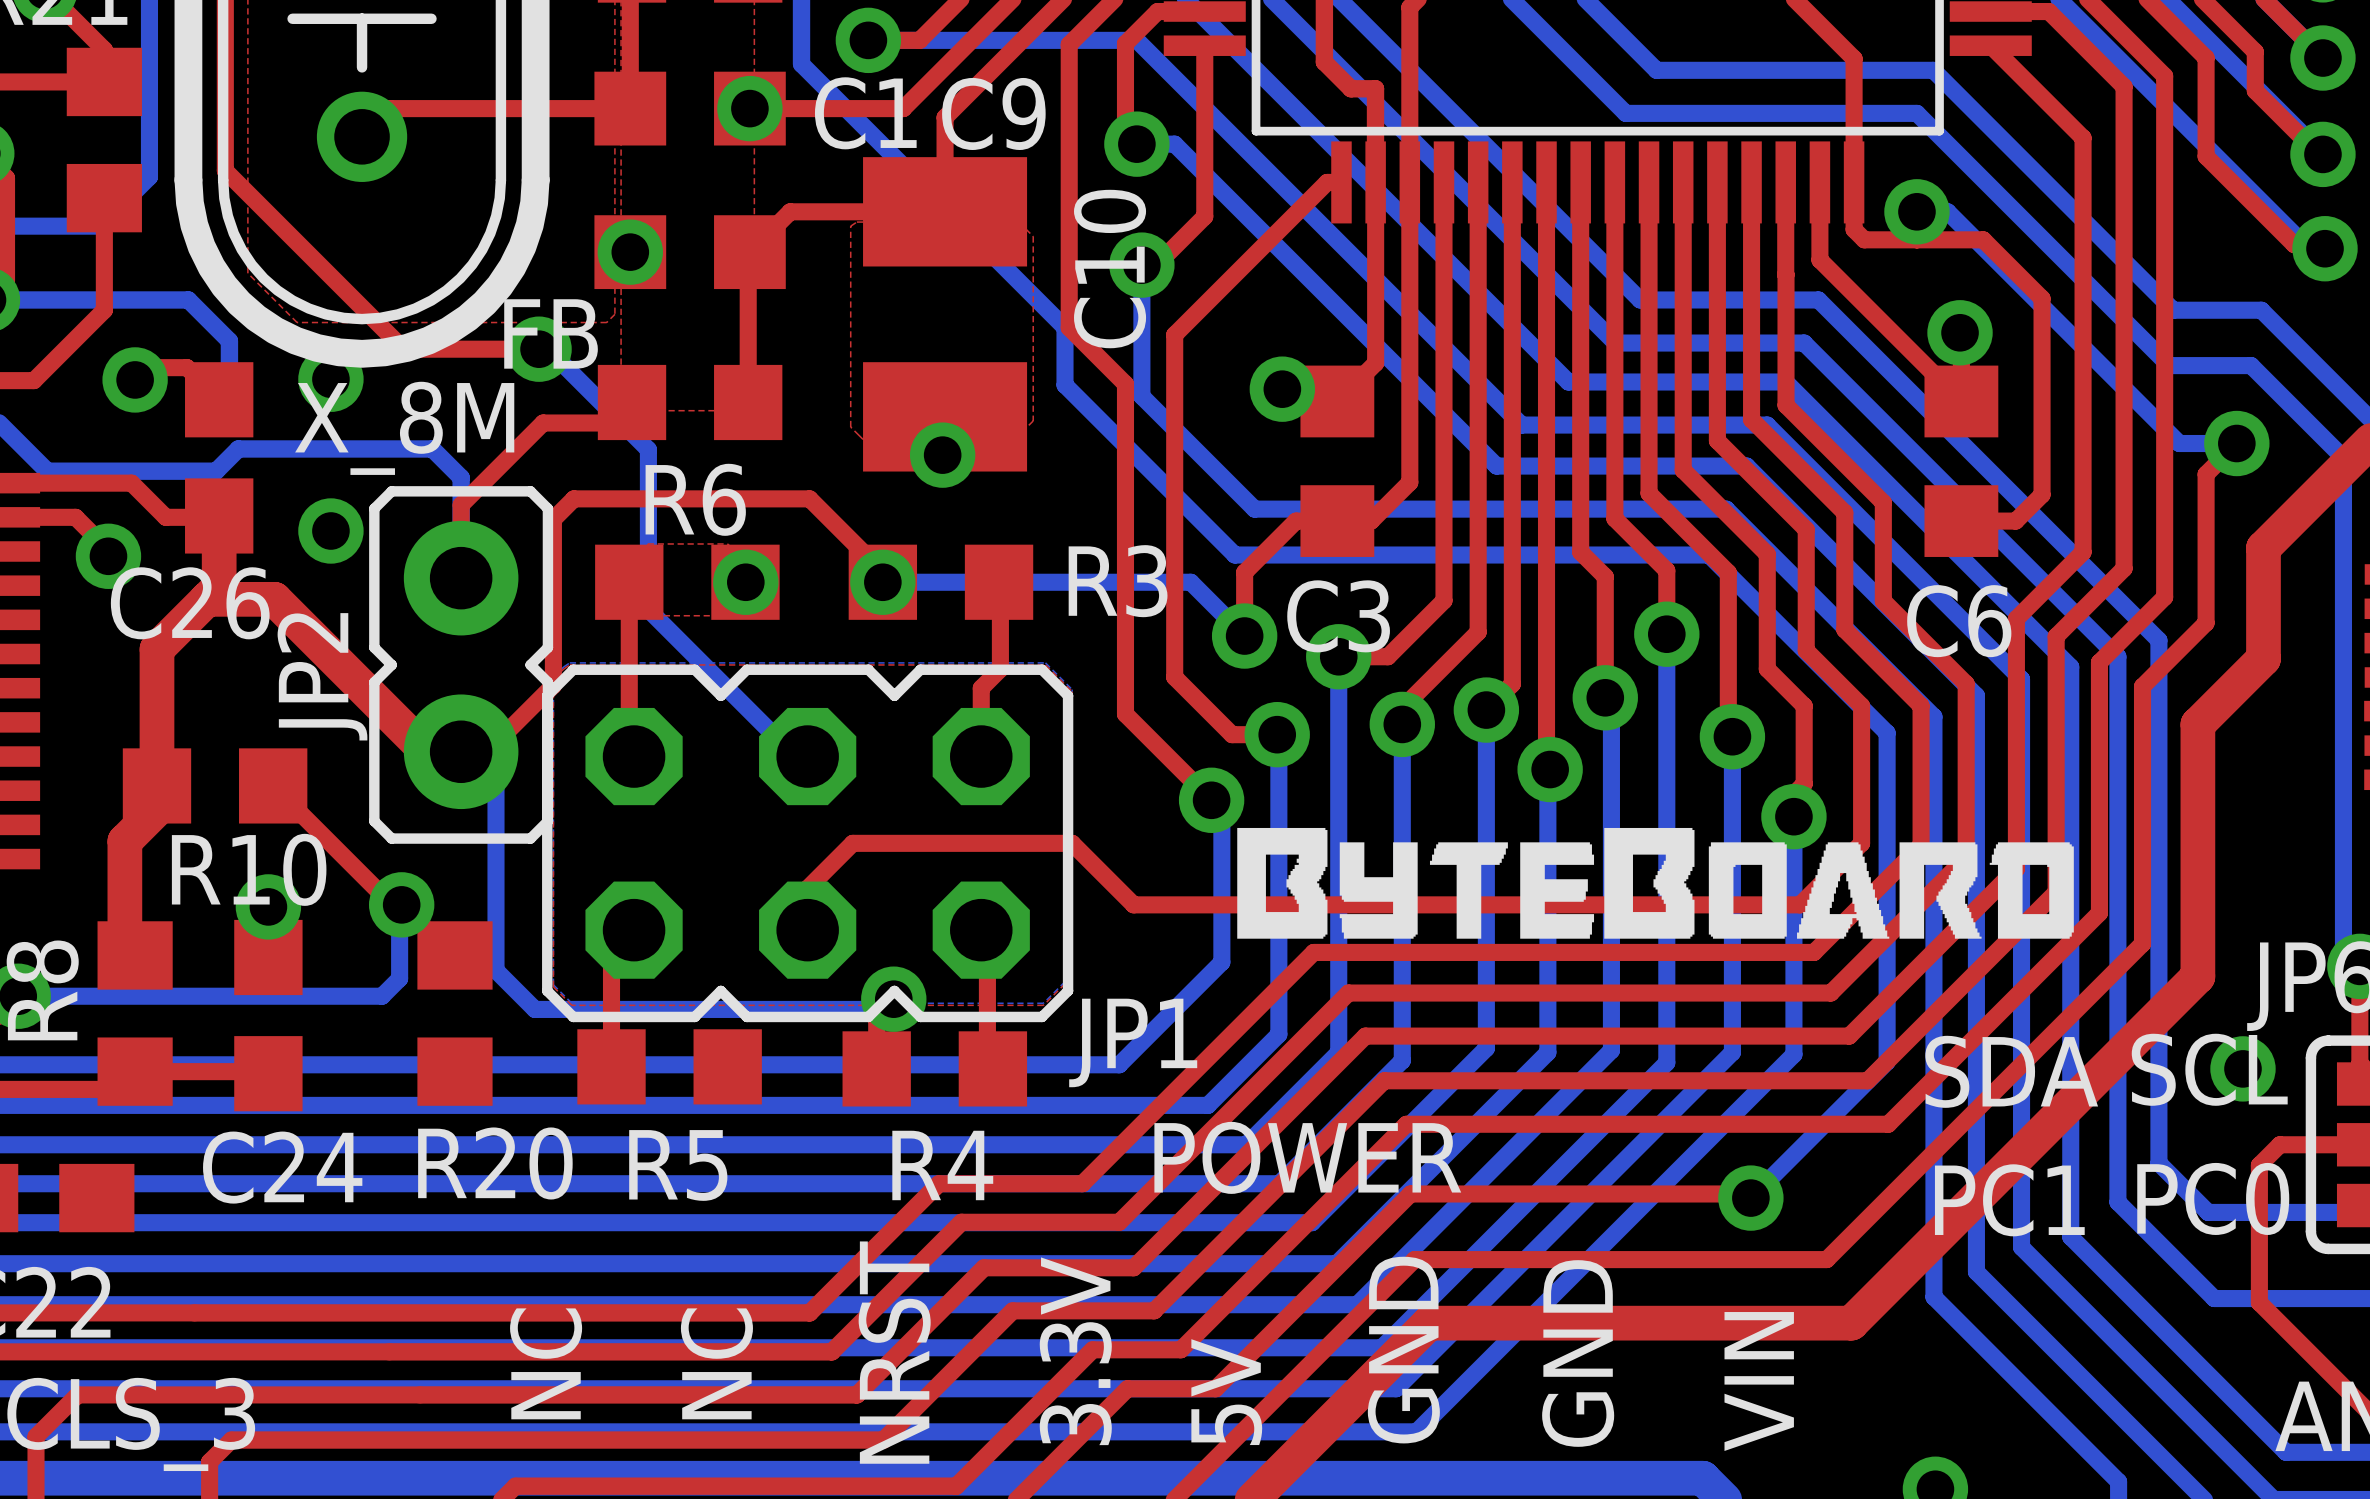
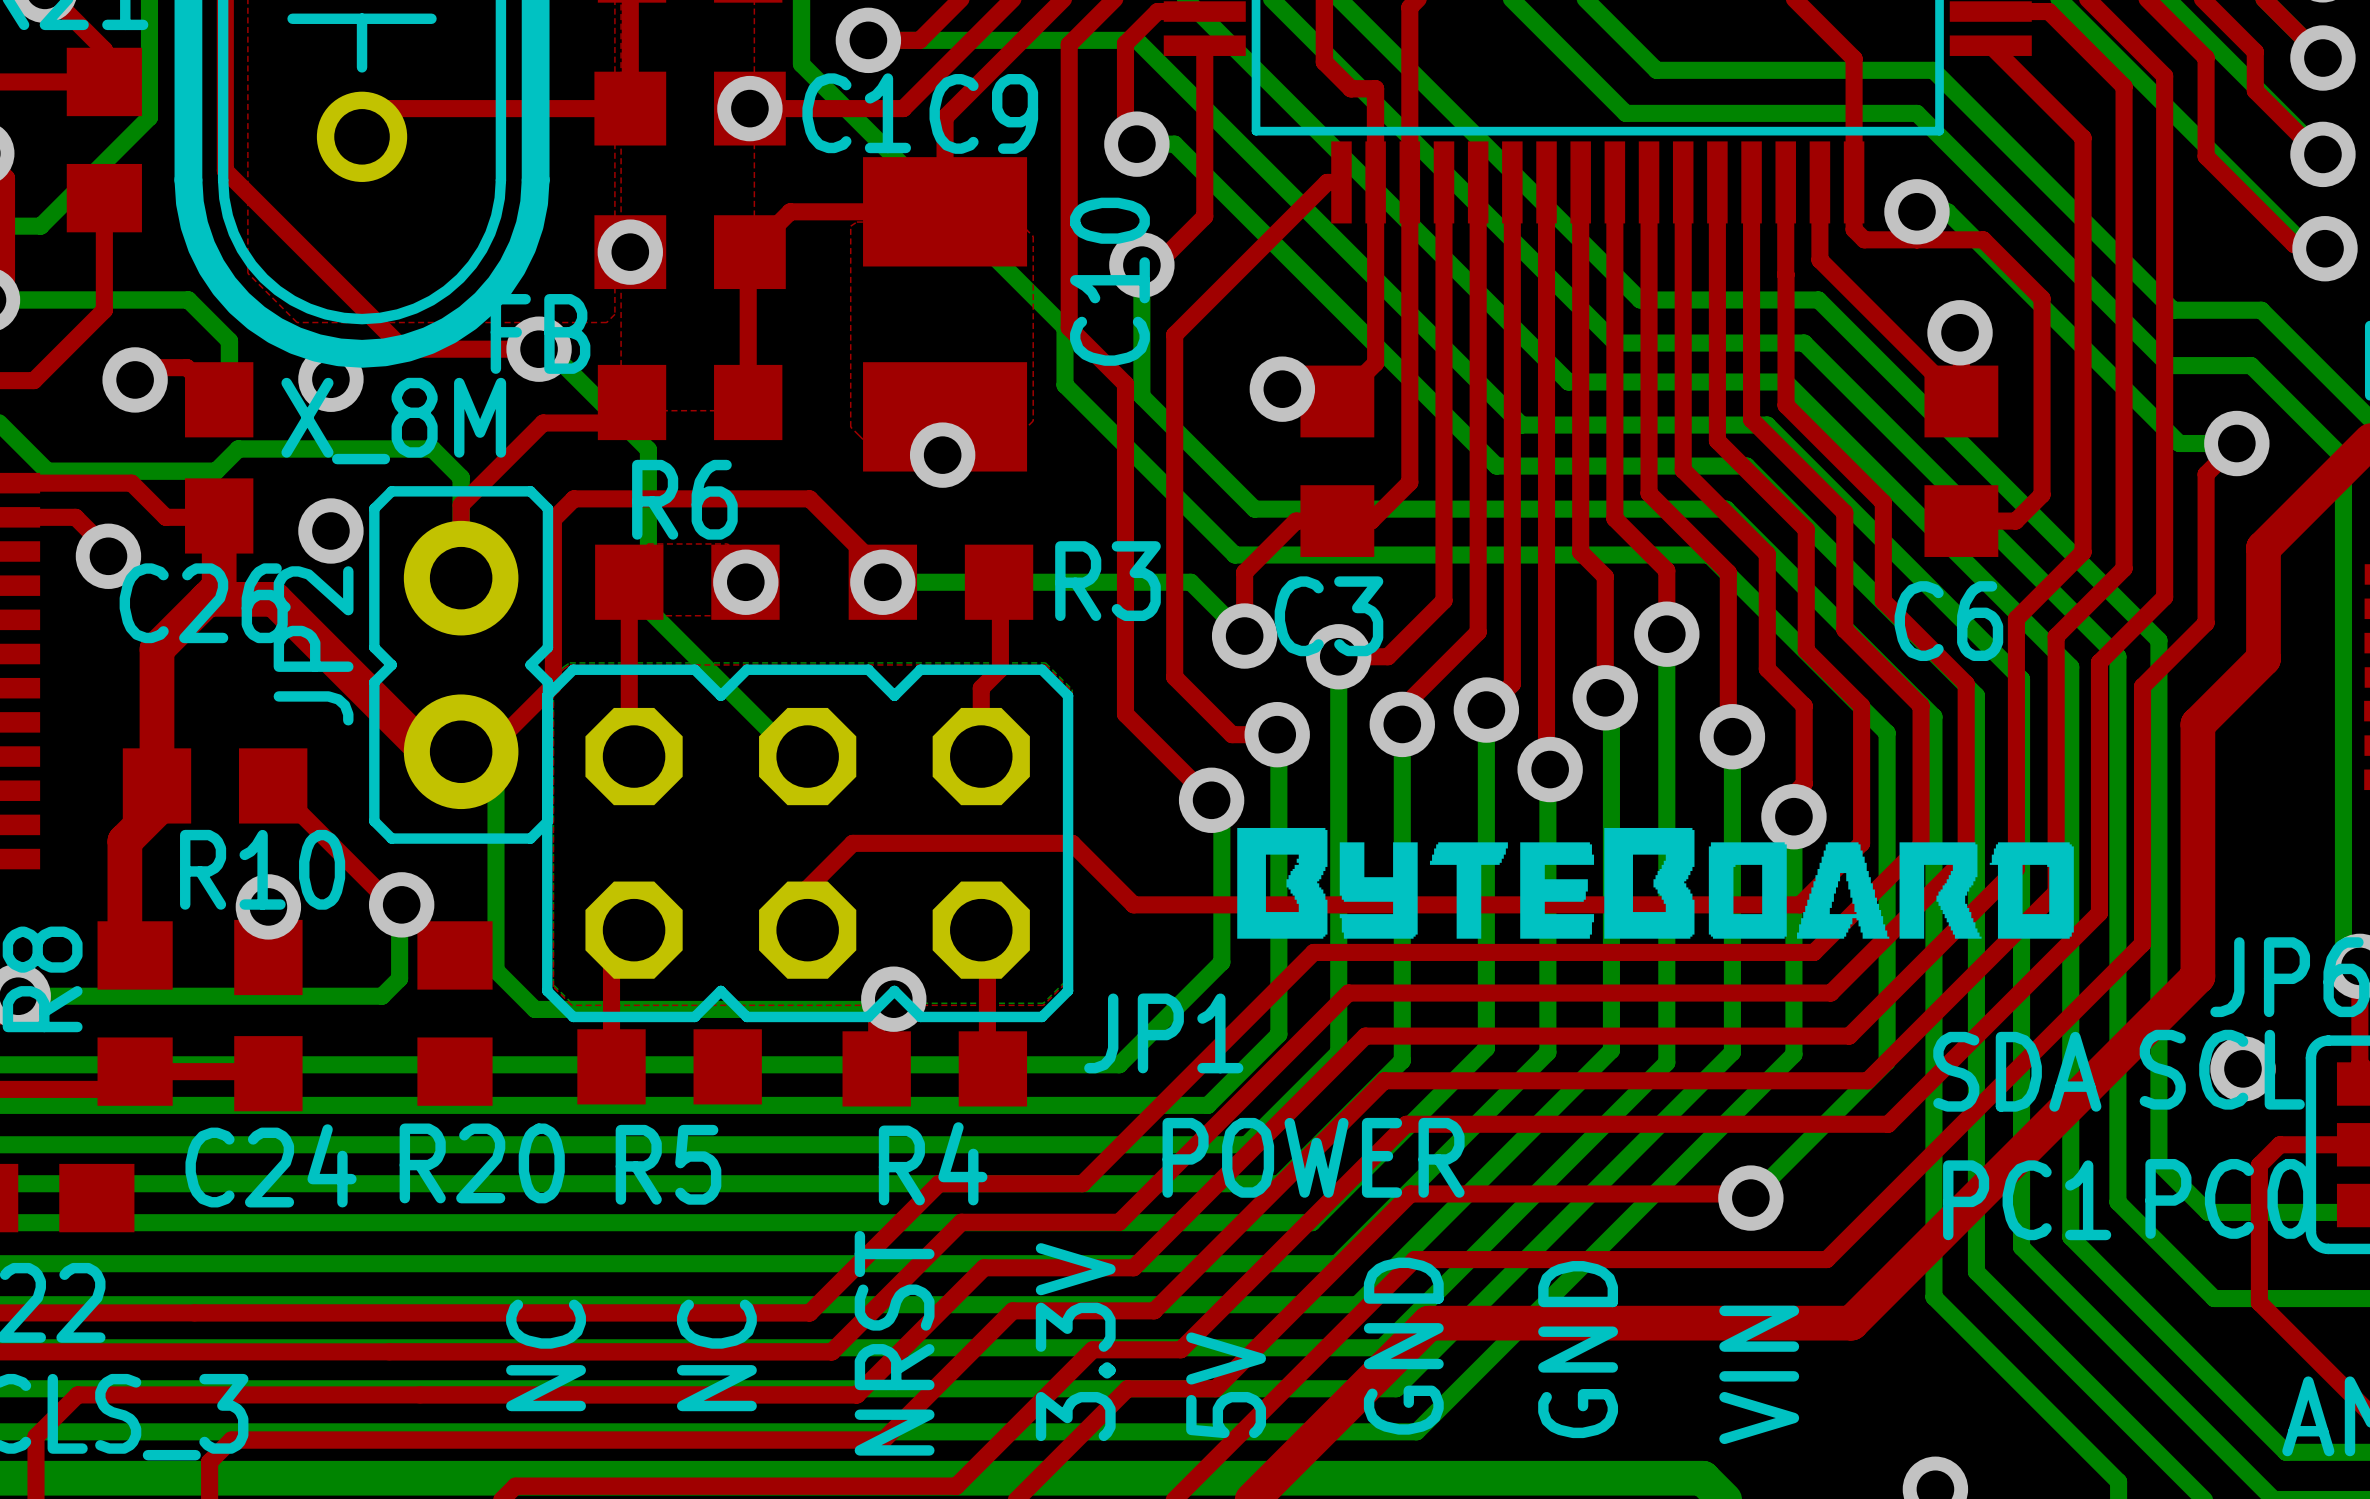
bottom track: (149, 117) (149, 176) (100, 226) (40, 226) -> (149, 117) (40, 226)

